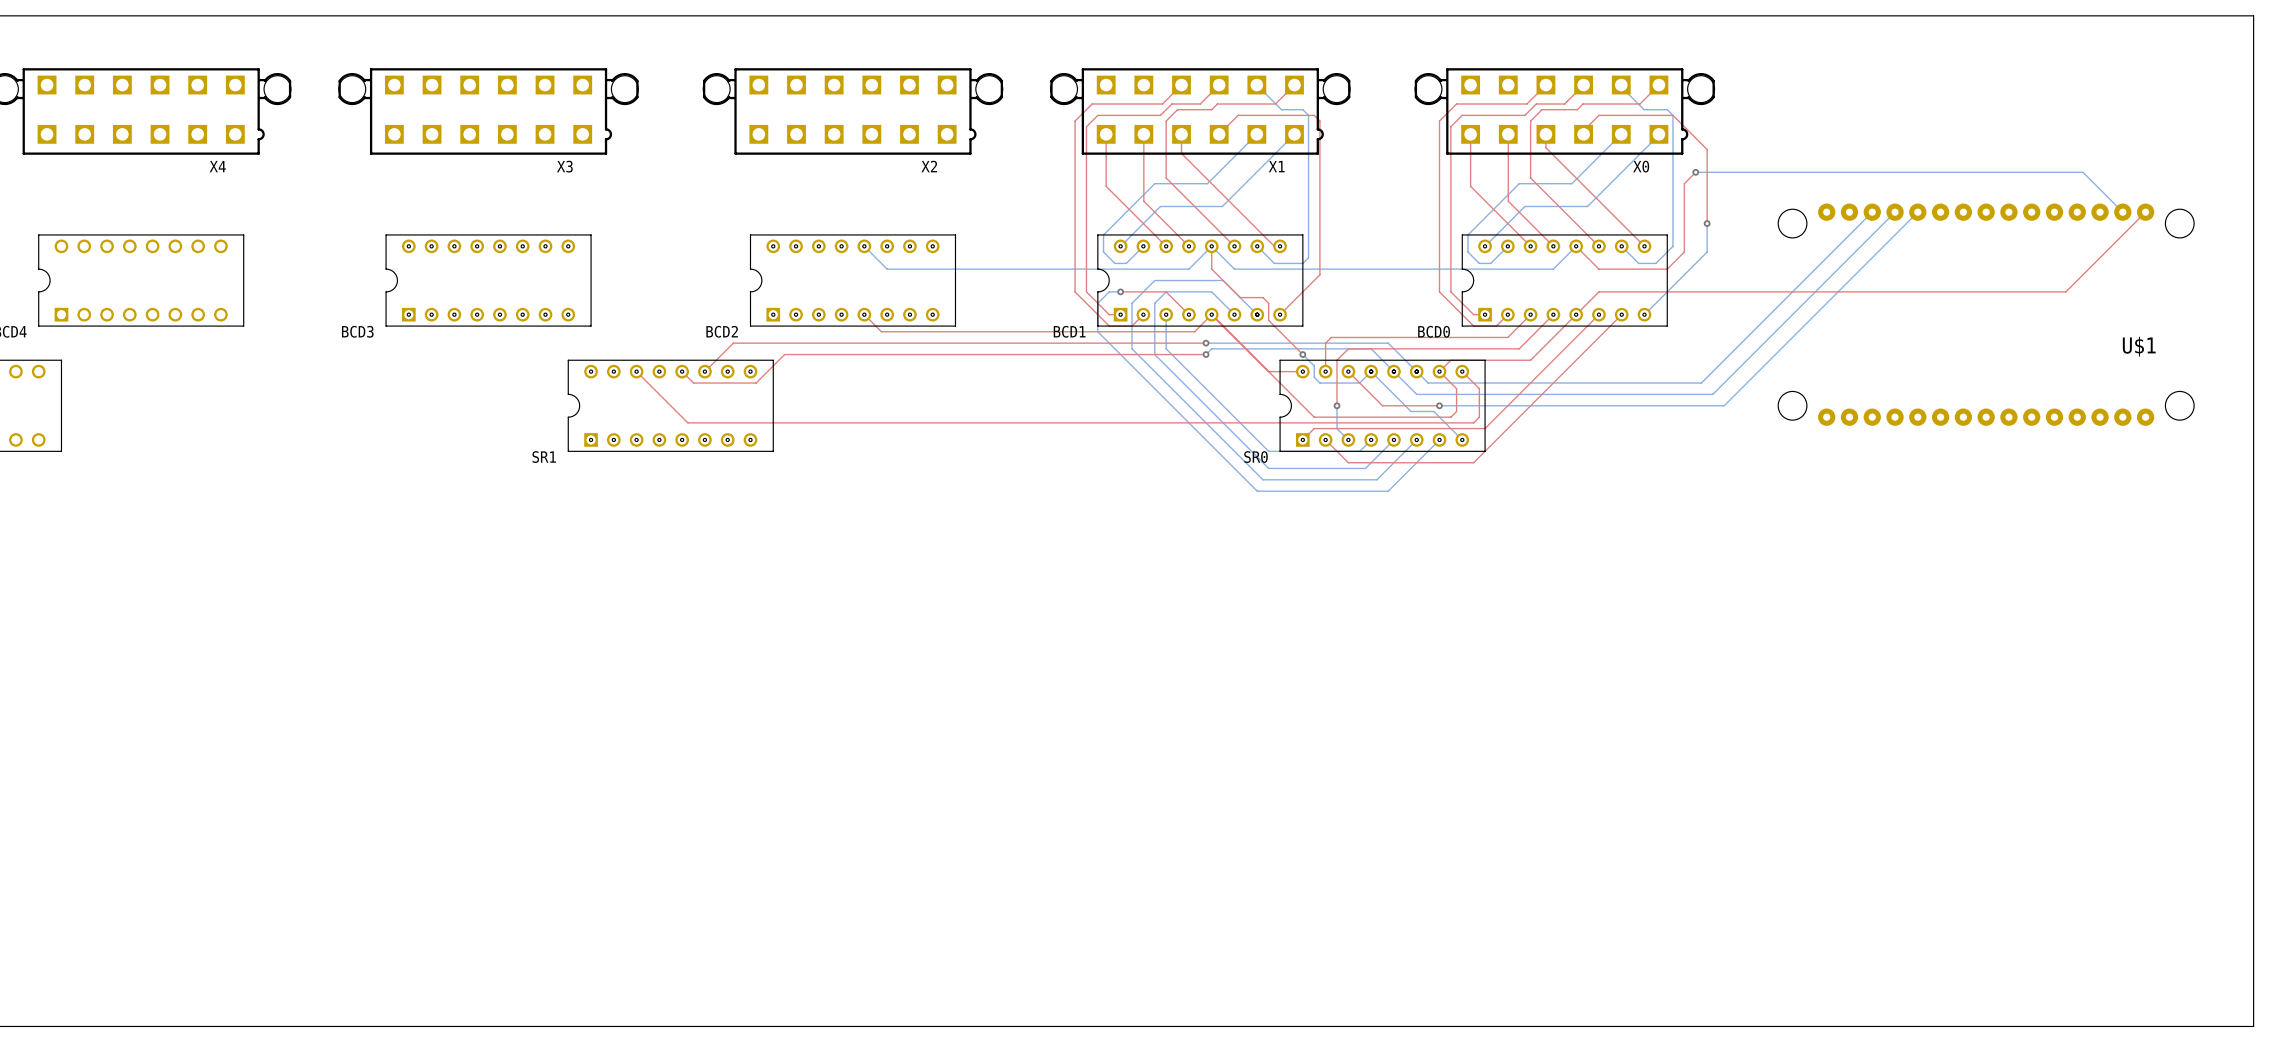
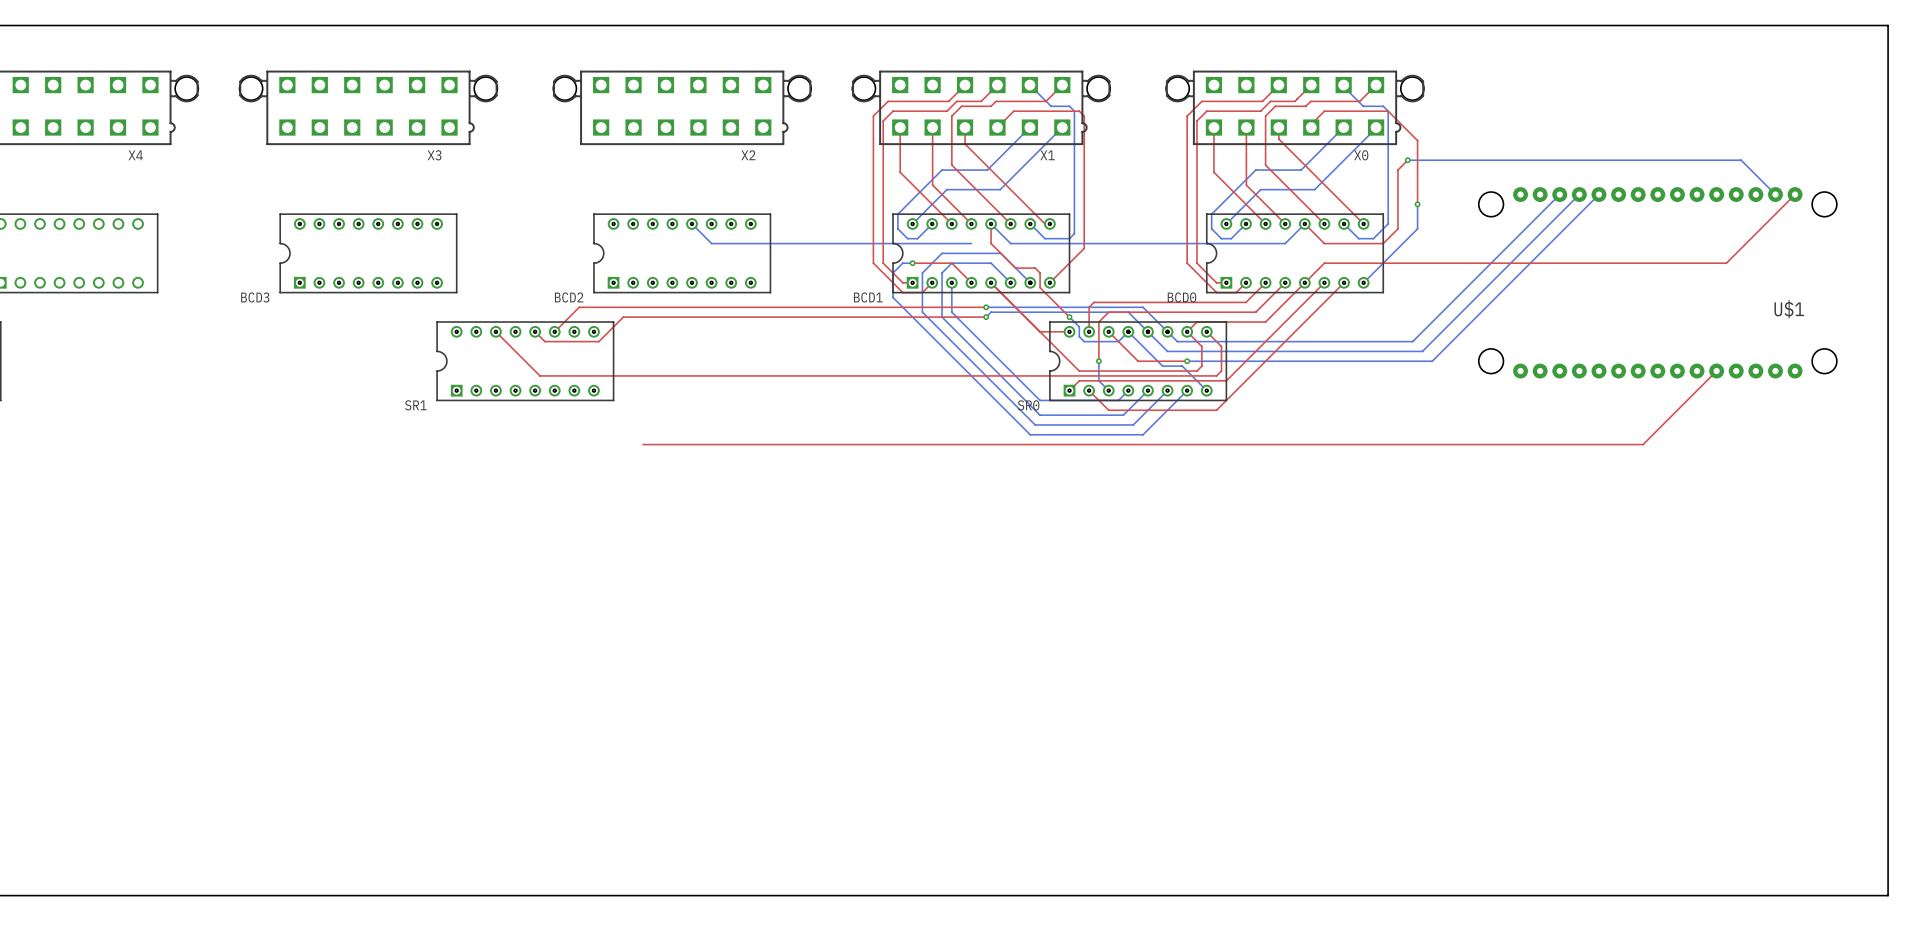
bottom track: (1211, 246) (1188, 269) -> none
top track: (864, 314) (881, 331) (1194, 331) (1211, 314) -> none
top track: none -> (1716, 371) (1643, 444) (642, 444)

